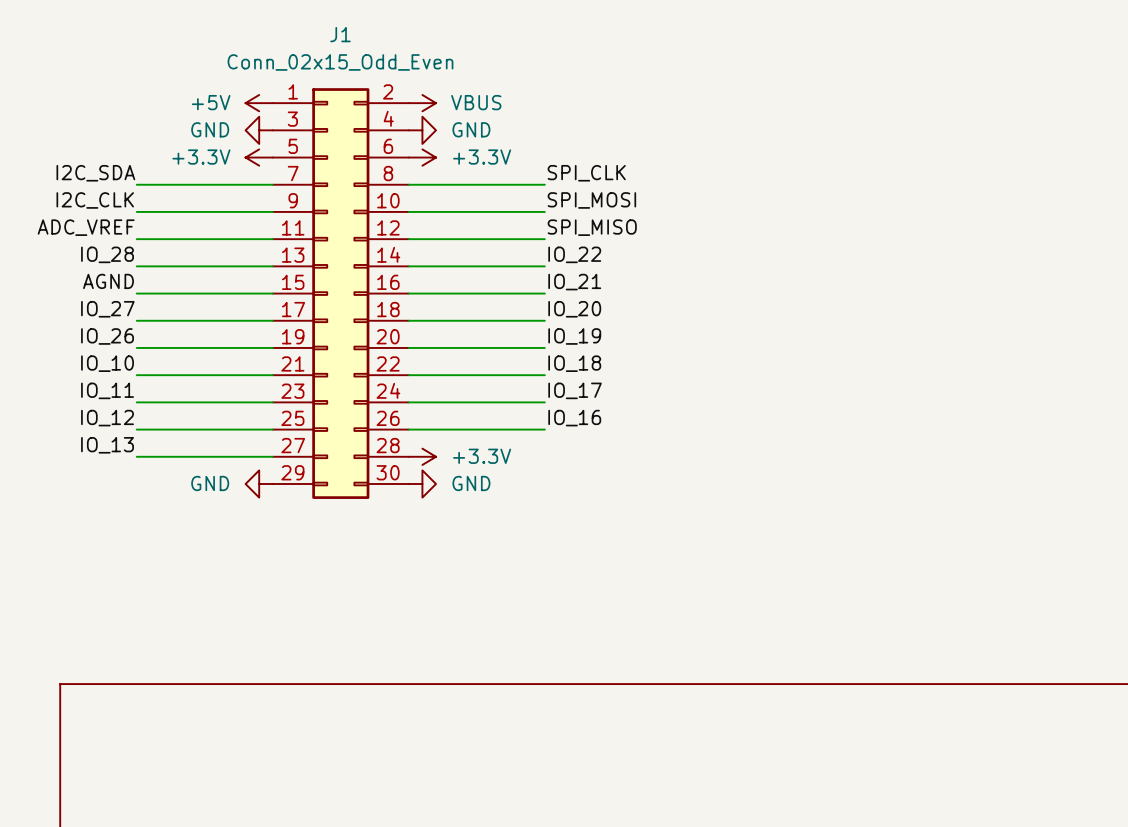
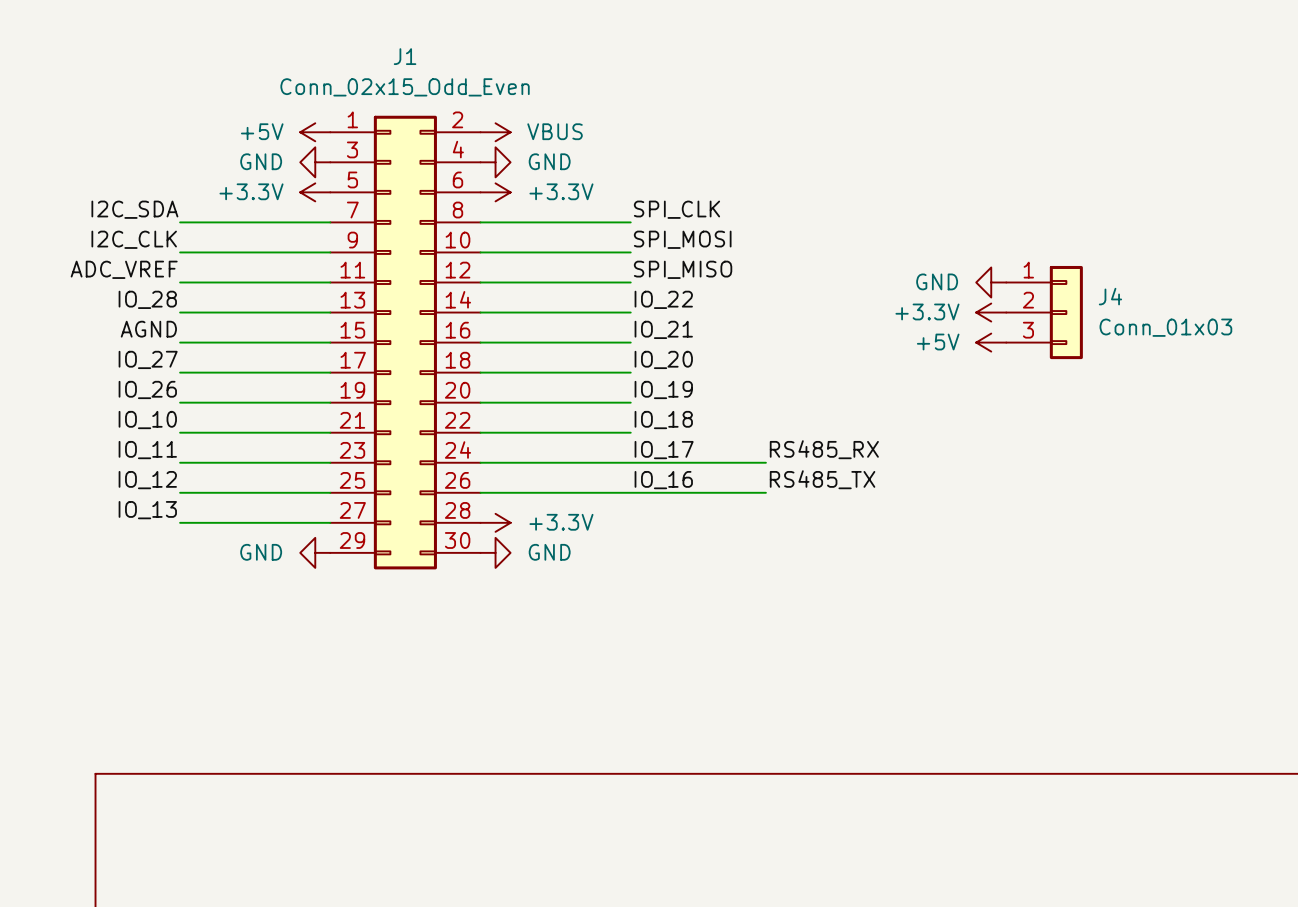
power symbol: none -> GND (991, 282)
power symbol: none -> +3.3V (991, 312)
J4: none -> Conn_01x03 (1044, 312)
power symbol: none -> +5V (991, 342)
label: none -> RS485_RX (824, 449)
wire: none -> (630, 462) (765, 462)
label: none -> RS485_TX (822, 479)
wire: none -> (630, 492) (765, 492)

